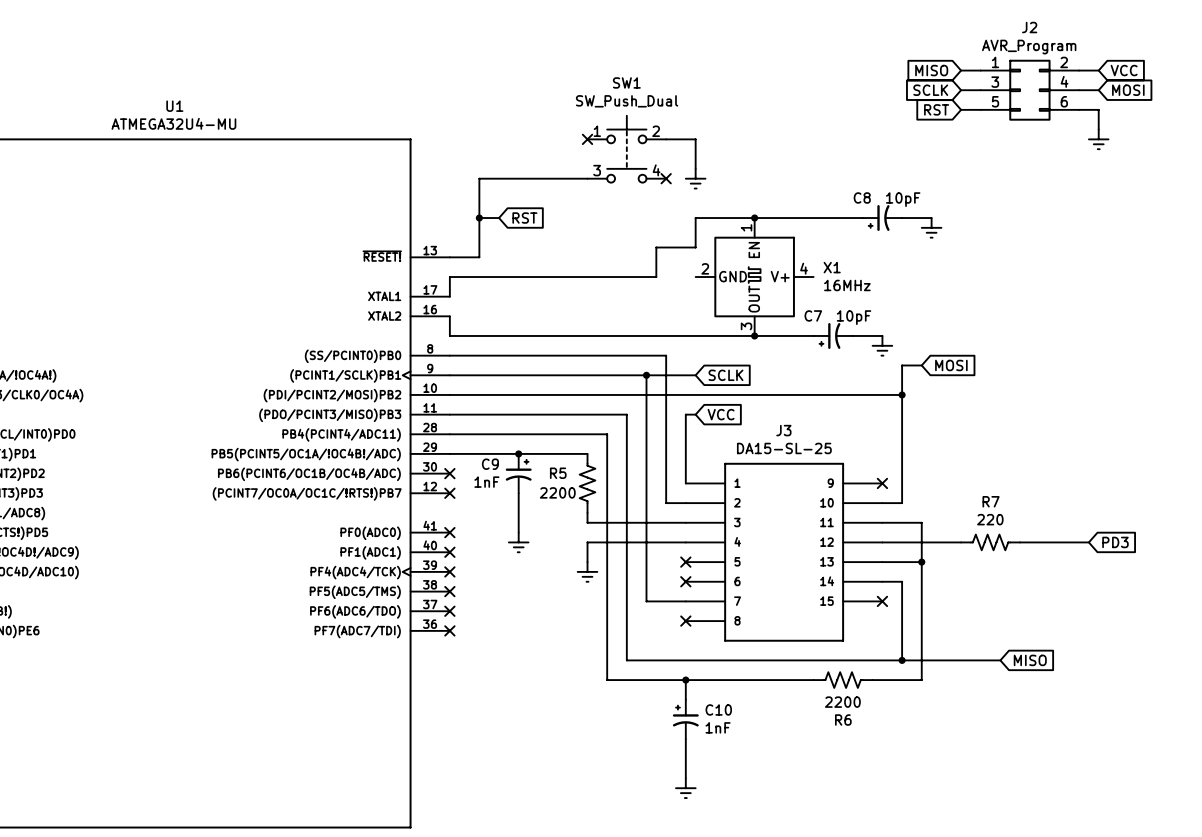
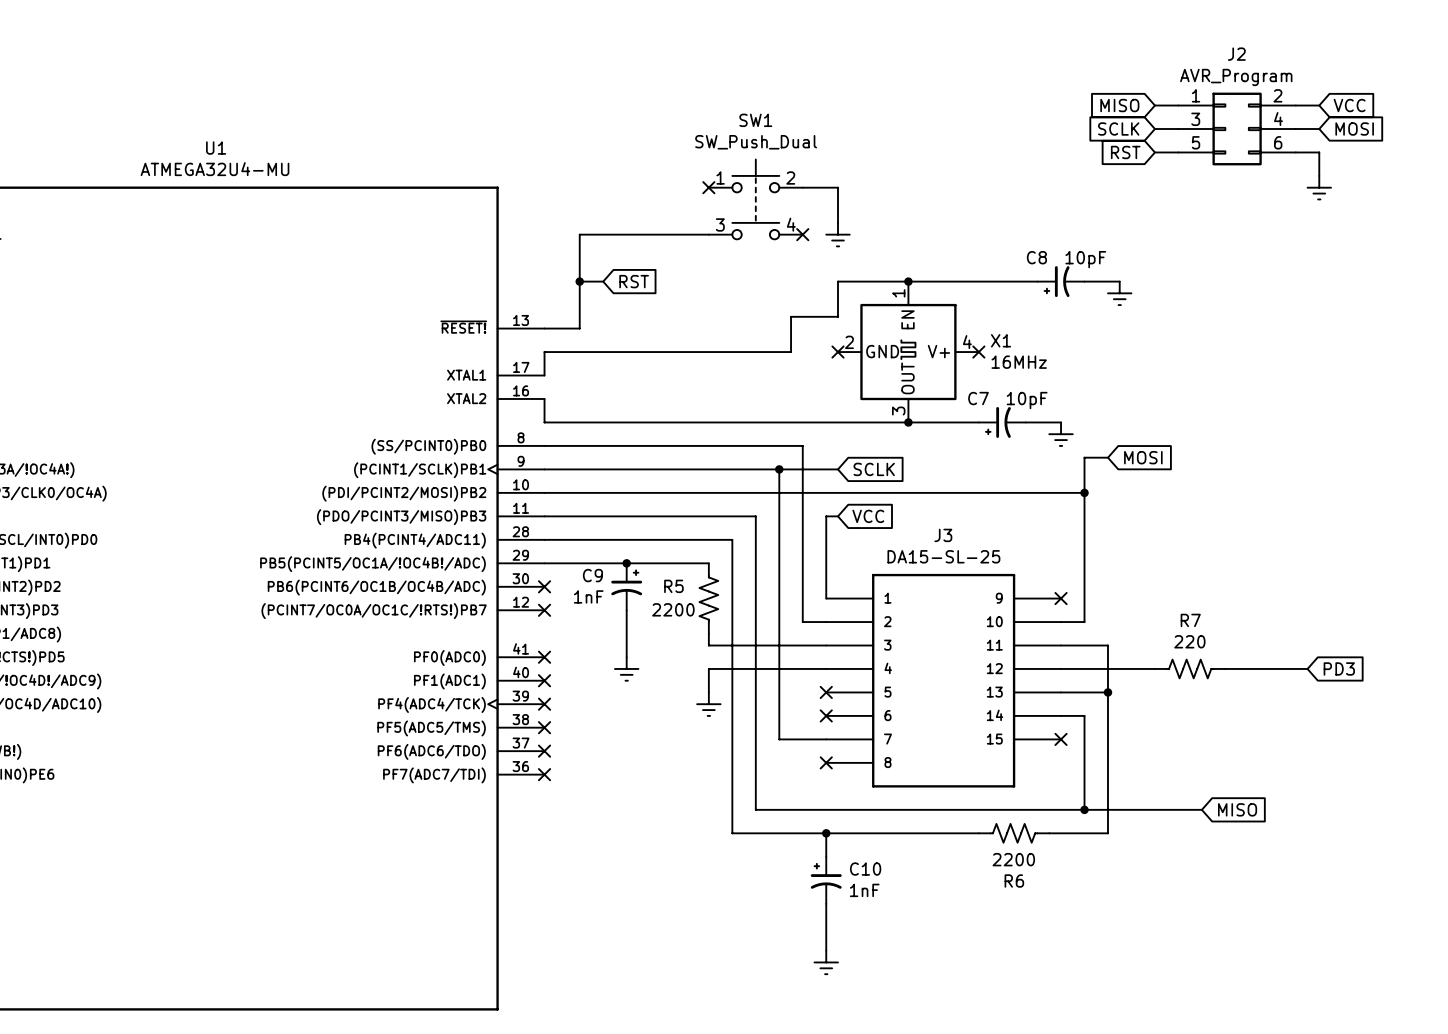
no-connect mark: none -> (837, 352)
no-connect mark: none -> (978, 352)

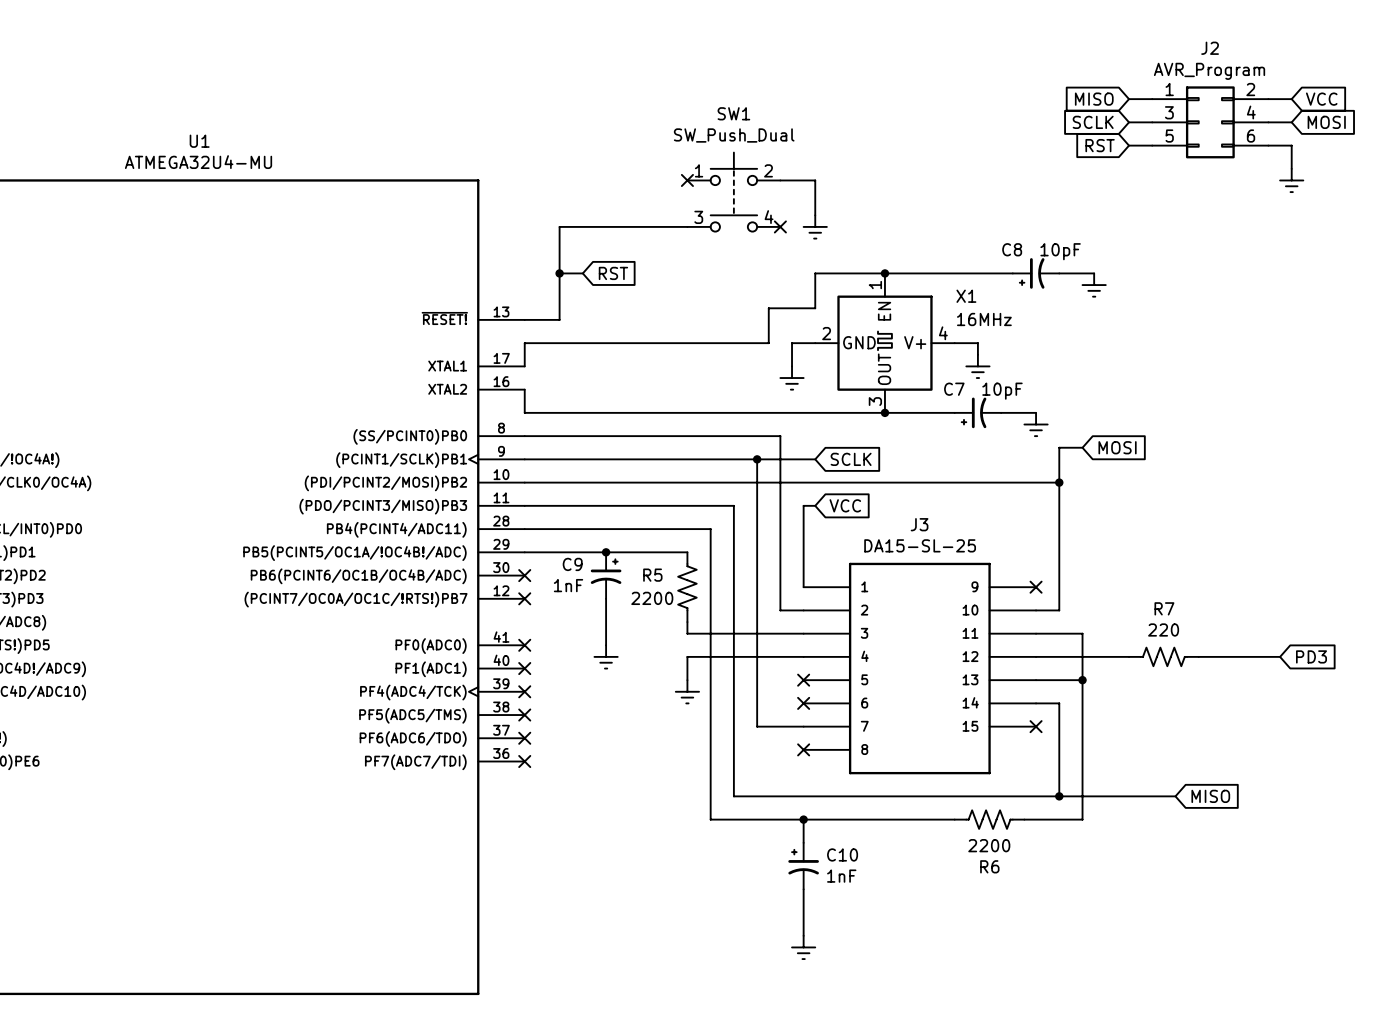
X1 name position: X1 (1001, 340) -> X1 (966, 296)
wire: none -> (815, 343) (792, 343) (792, 366)
no-connect mark: (837, 352) -> none
wire: none -> (954, 343) (977, 343) (977, 354)
no-connect mark: (978, 352) -> none
X1 value position: 16MHz (1019, 362) -> 16MHz (984, 319)
power symbol: none -> (977, 366)
power symbol: none -> (792, 378)

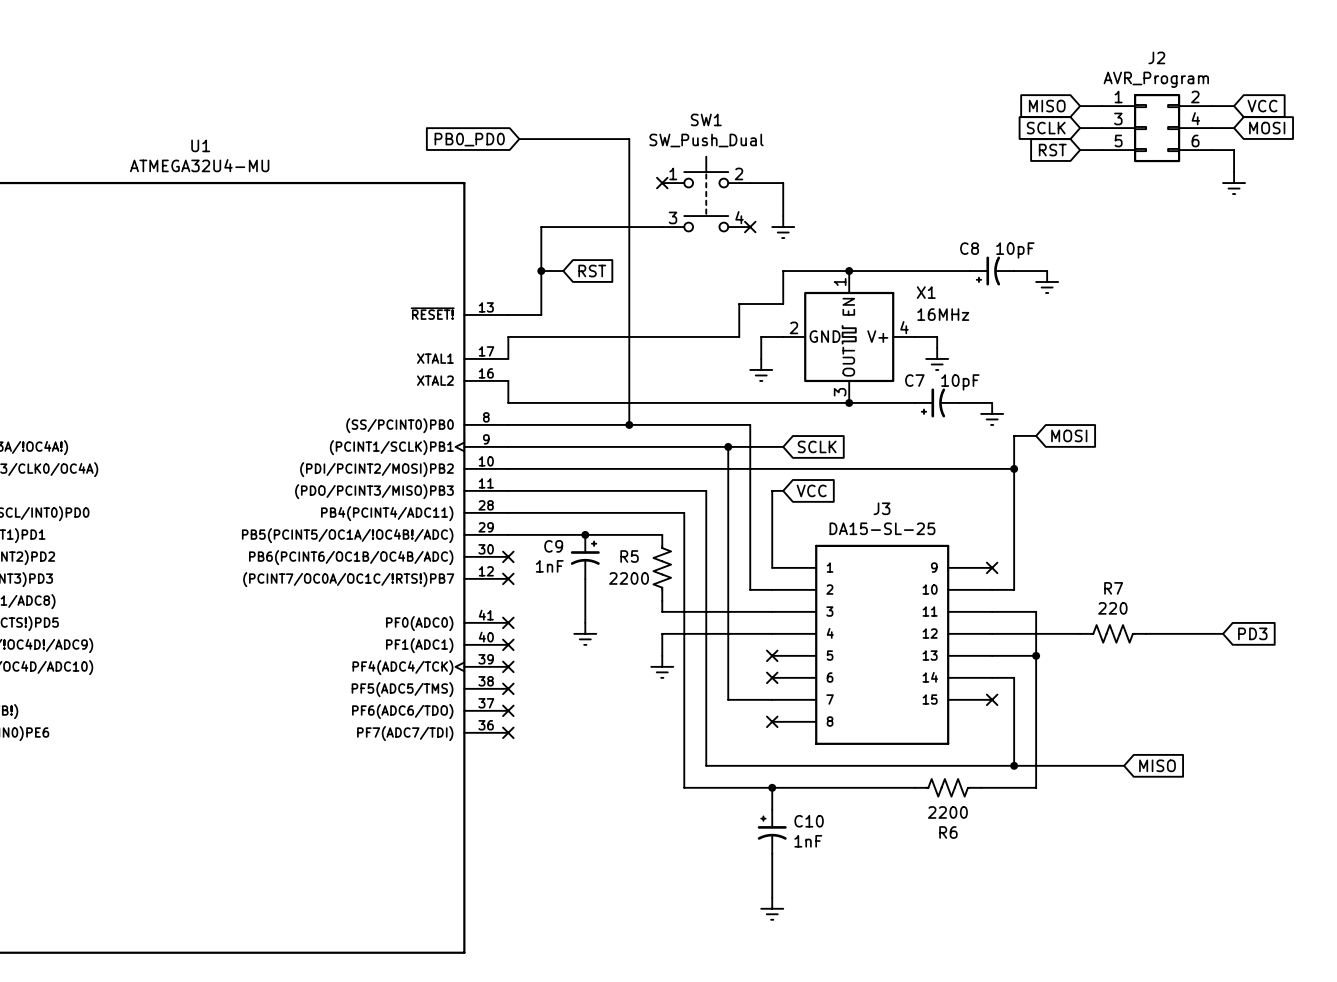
wire: none -> (519, 139) (629, 139) (629, 424)
global label: none -> PB0_PD0 (469, 139)
junction: none -> (629, 424)

